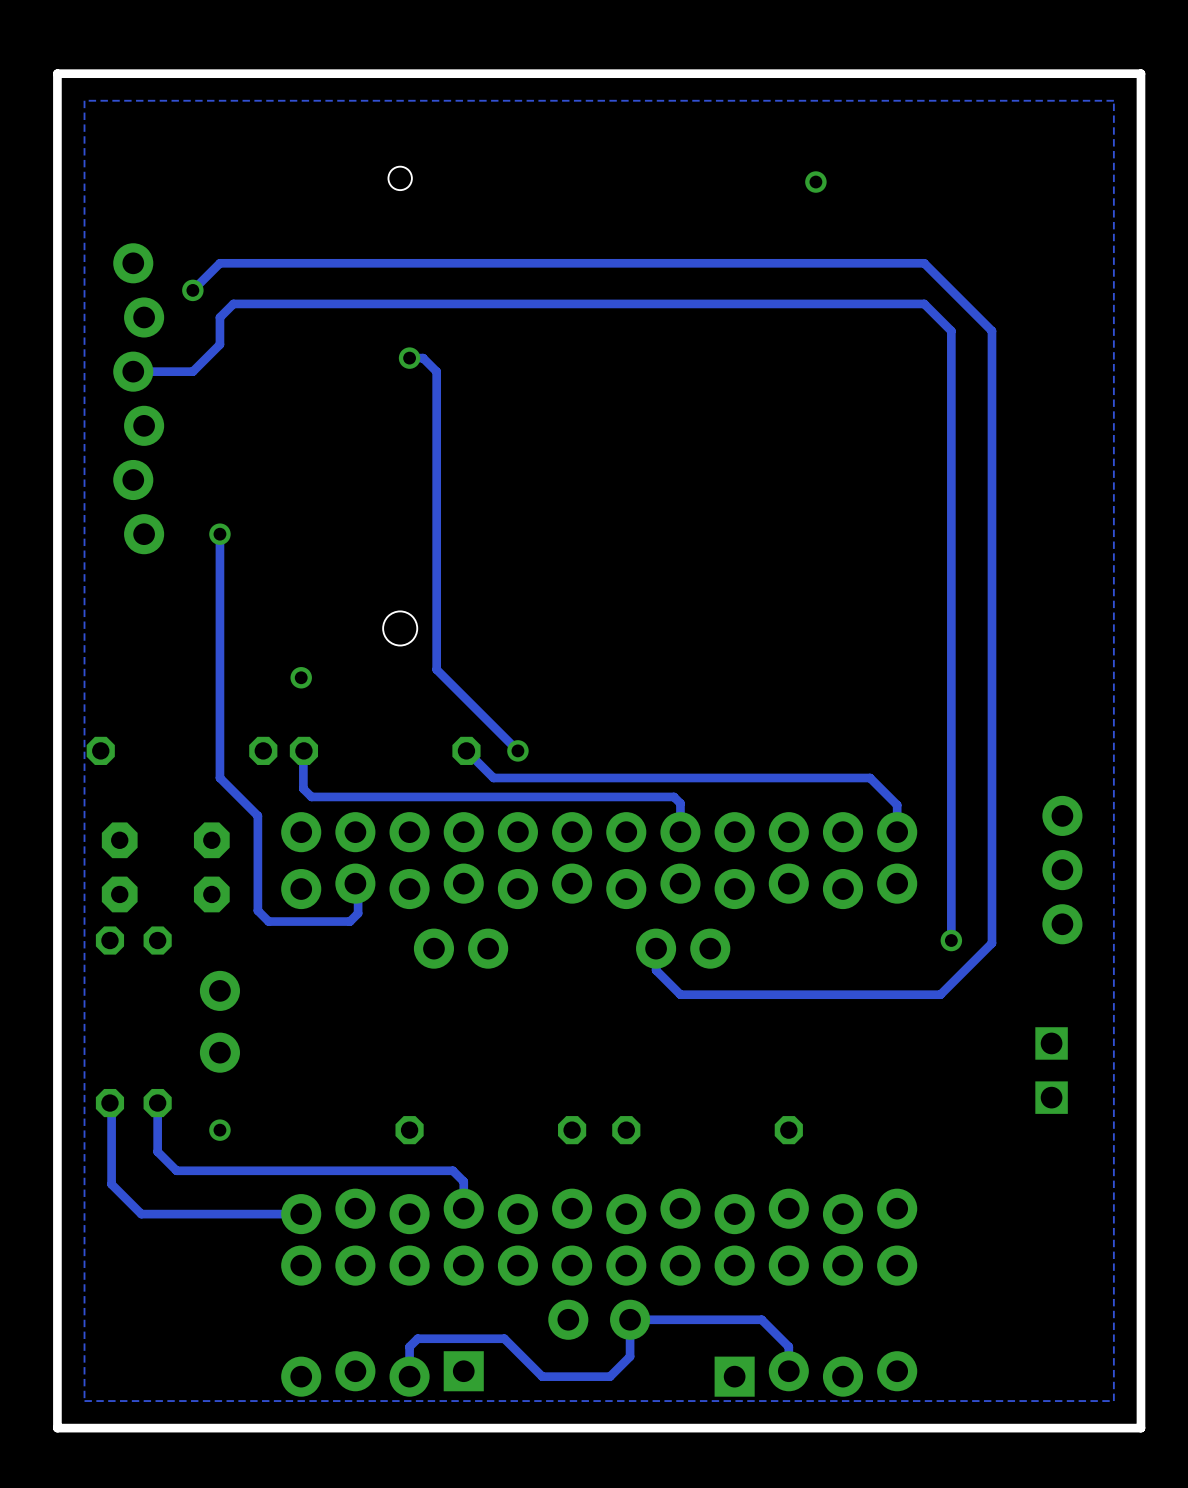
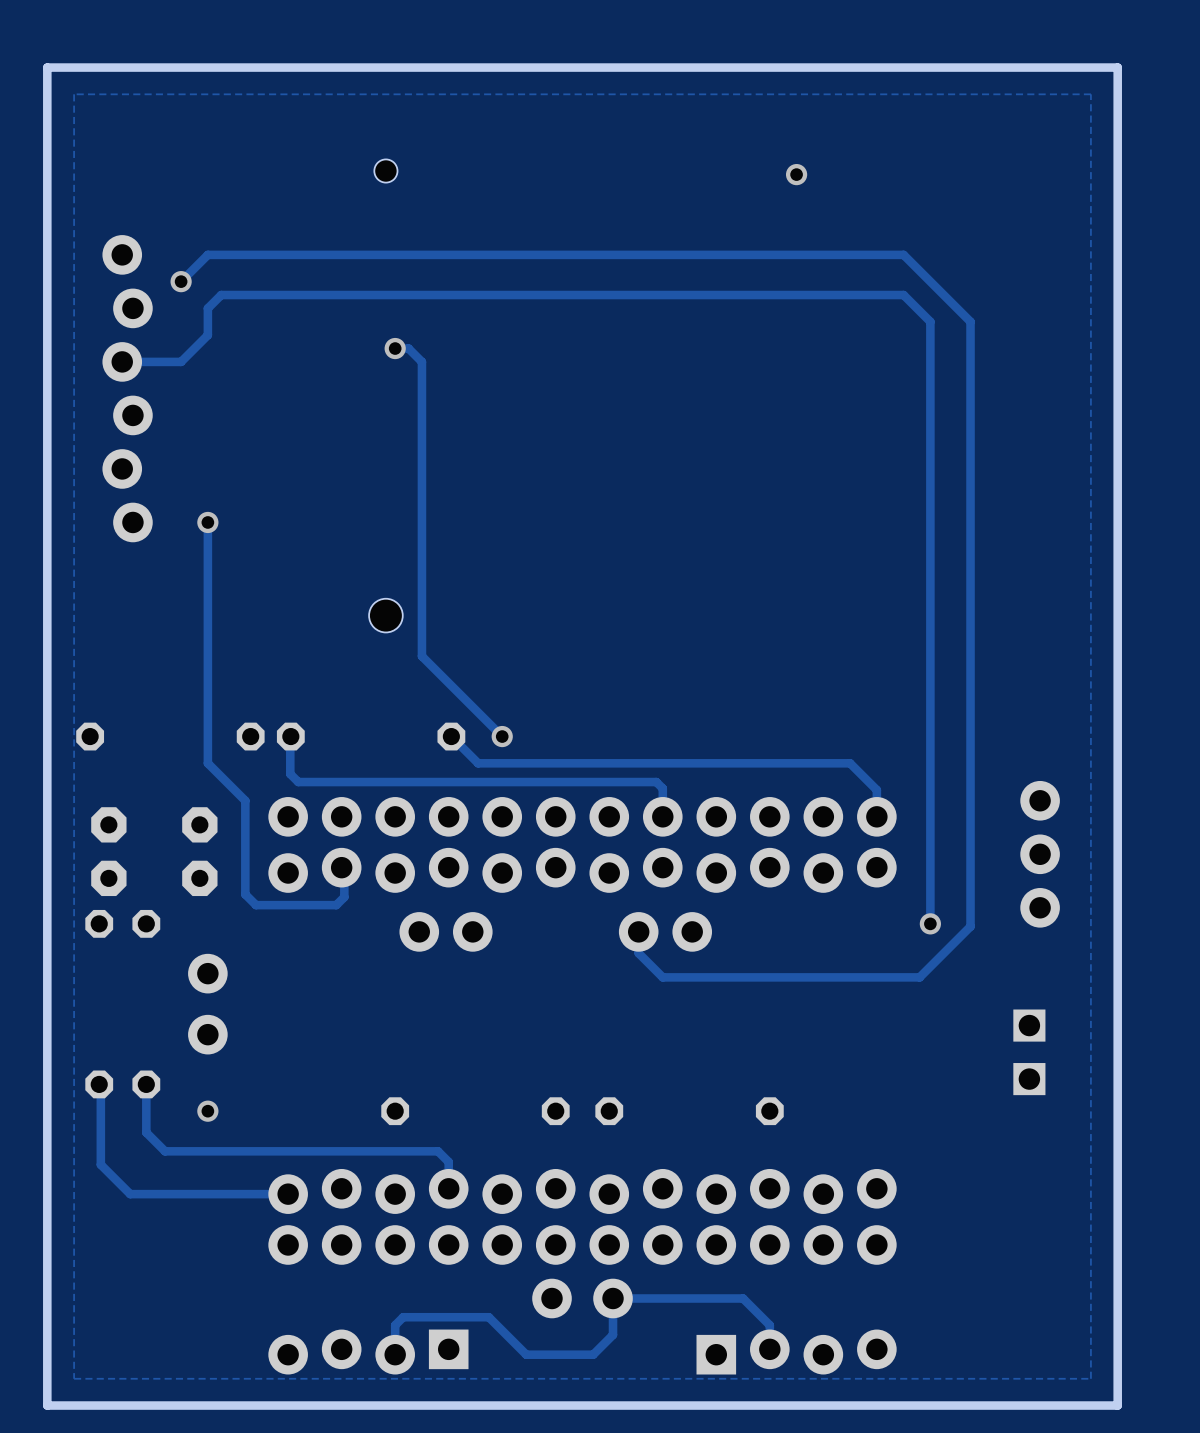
via: (301, 677) -> none

